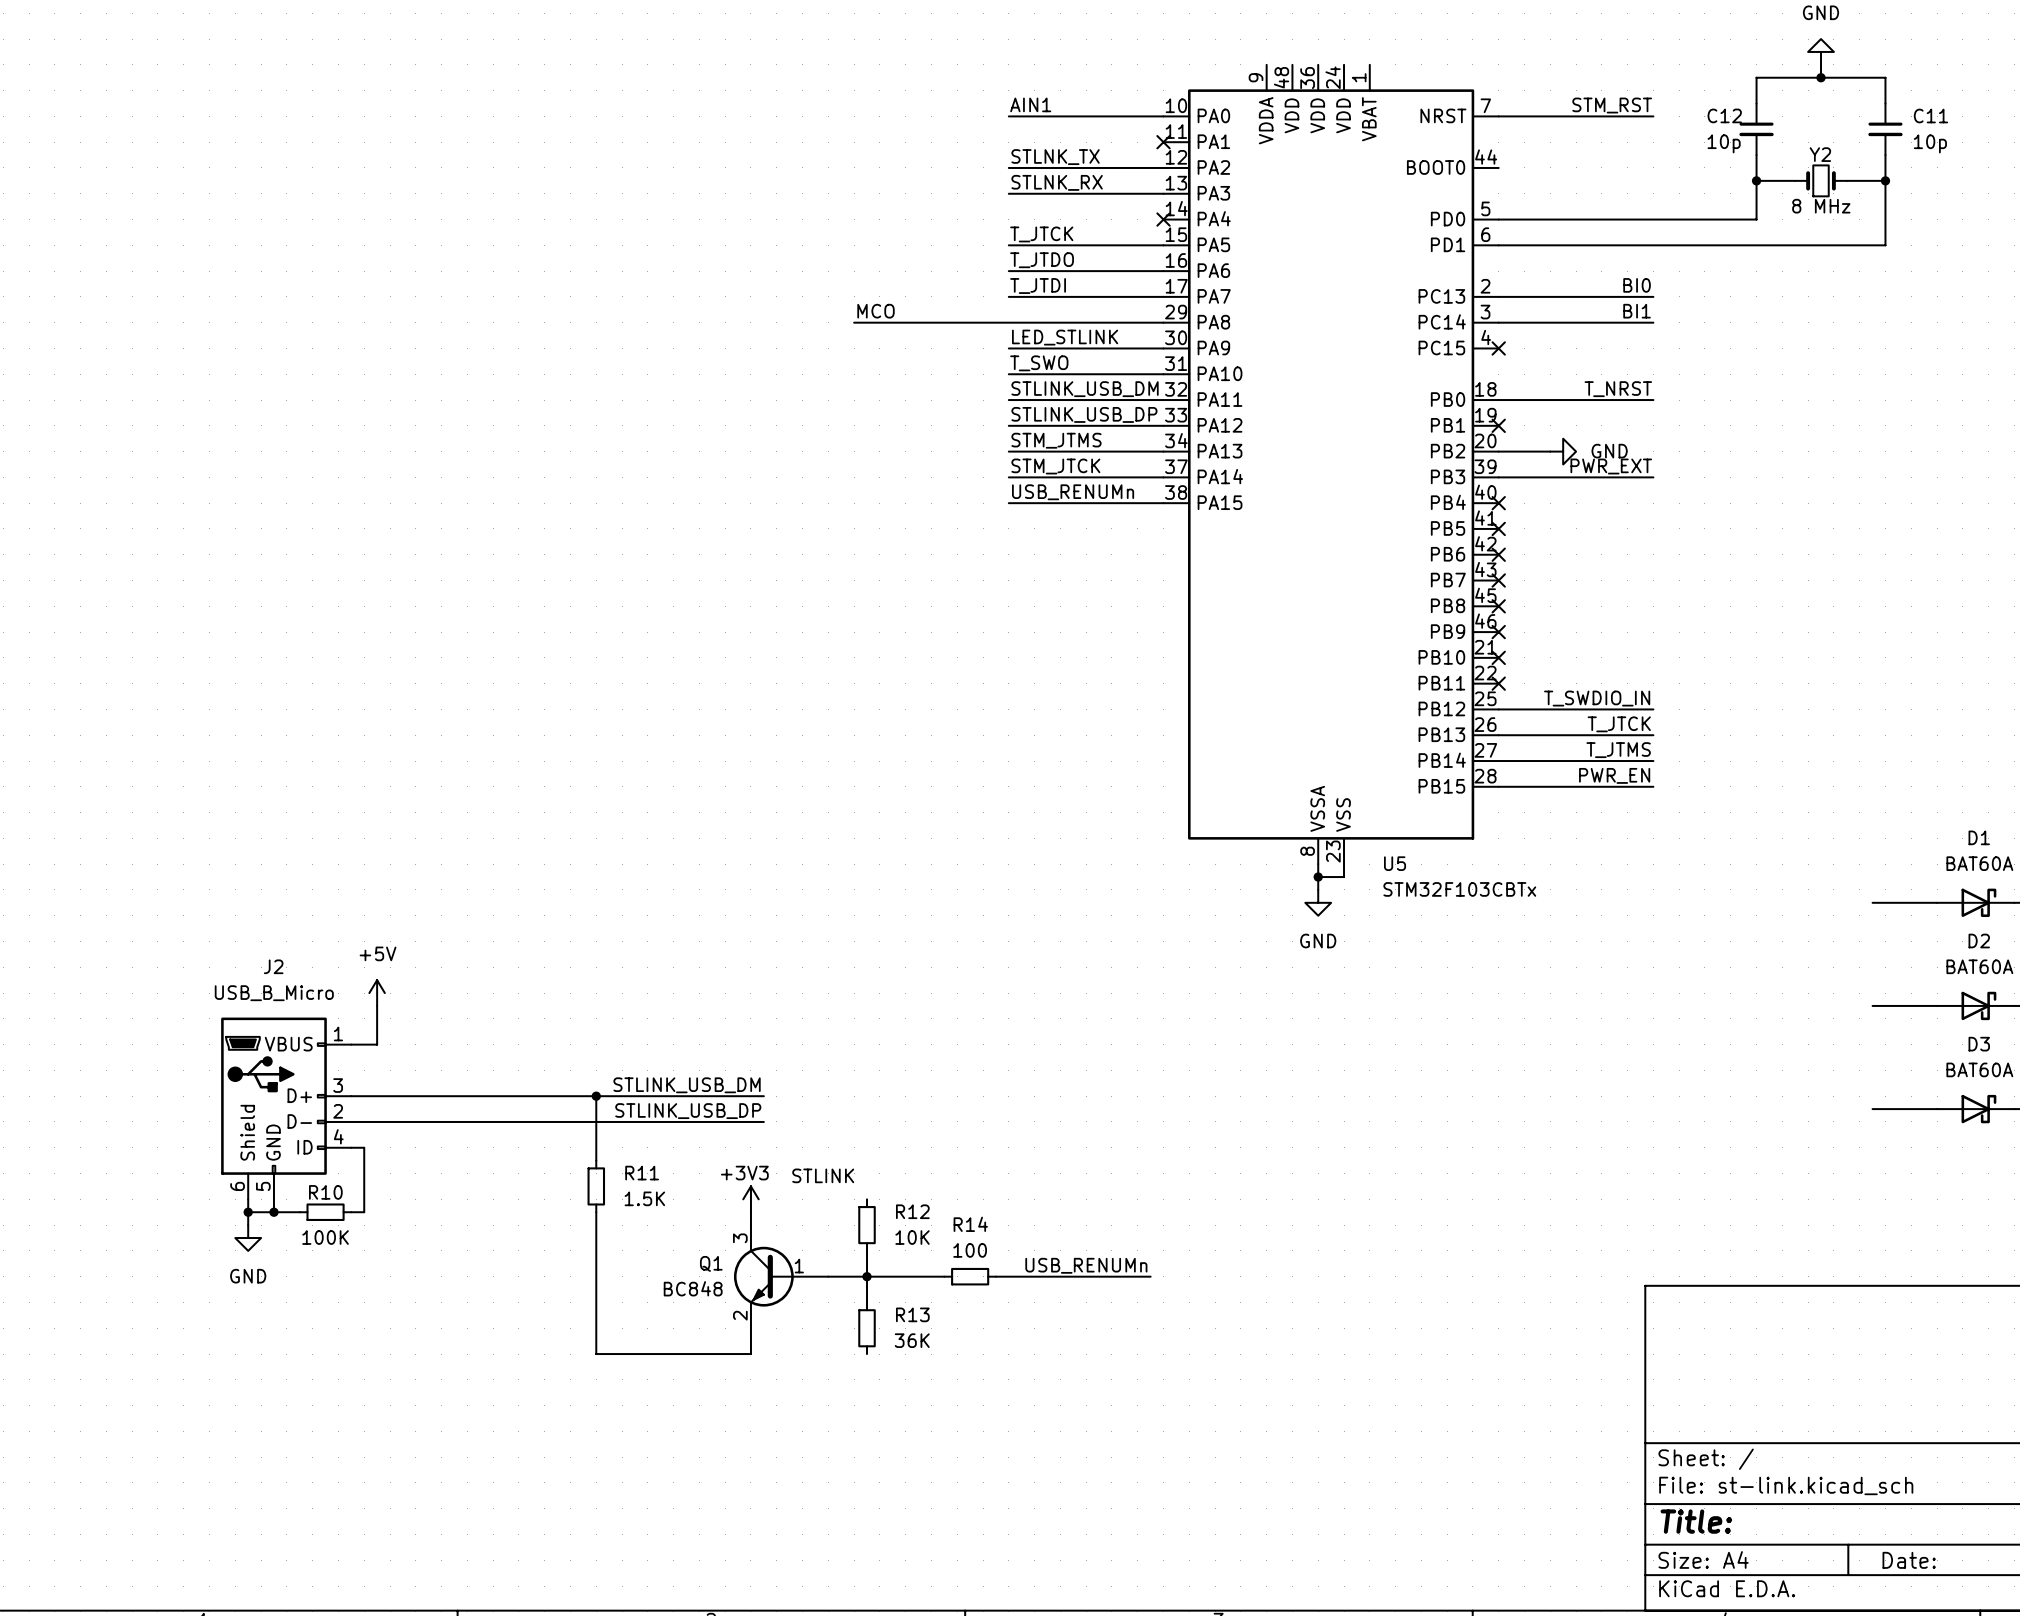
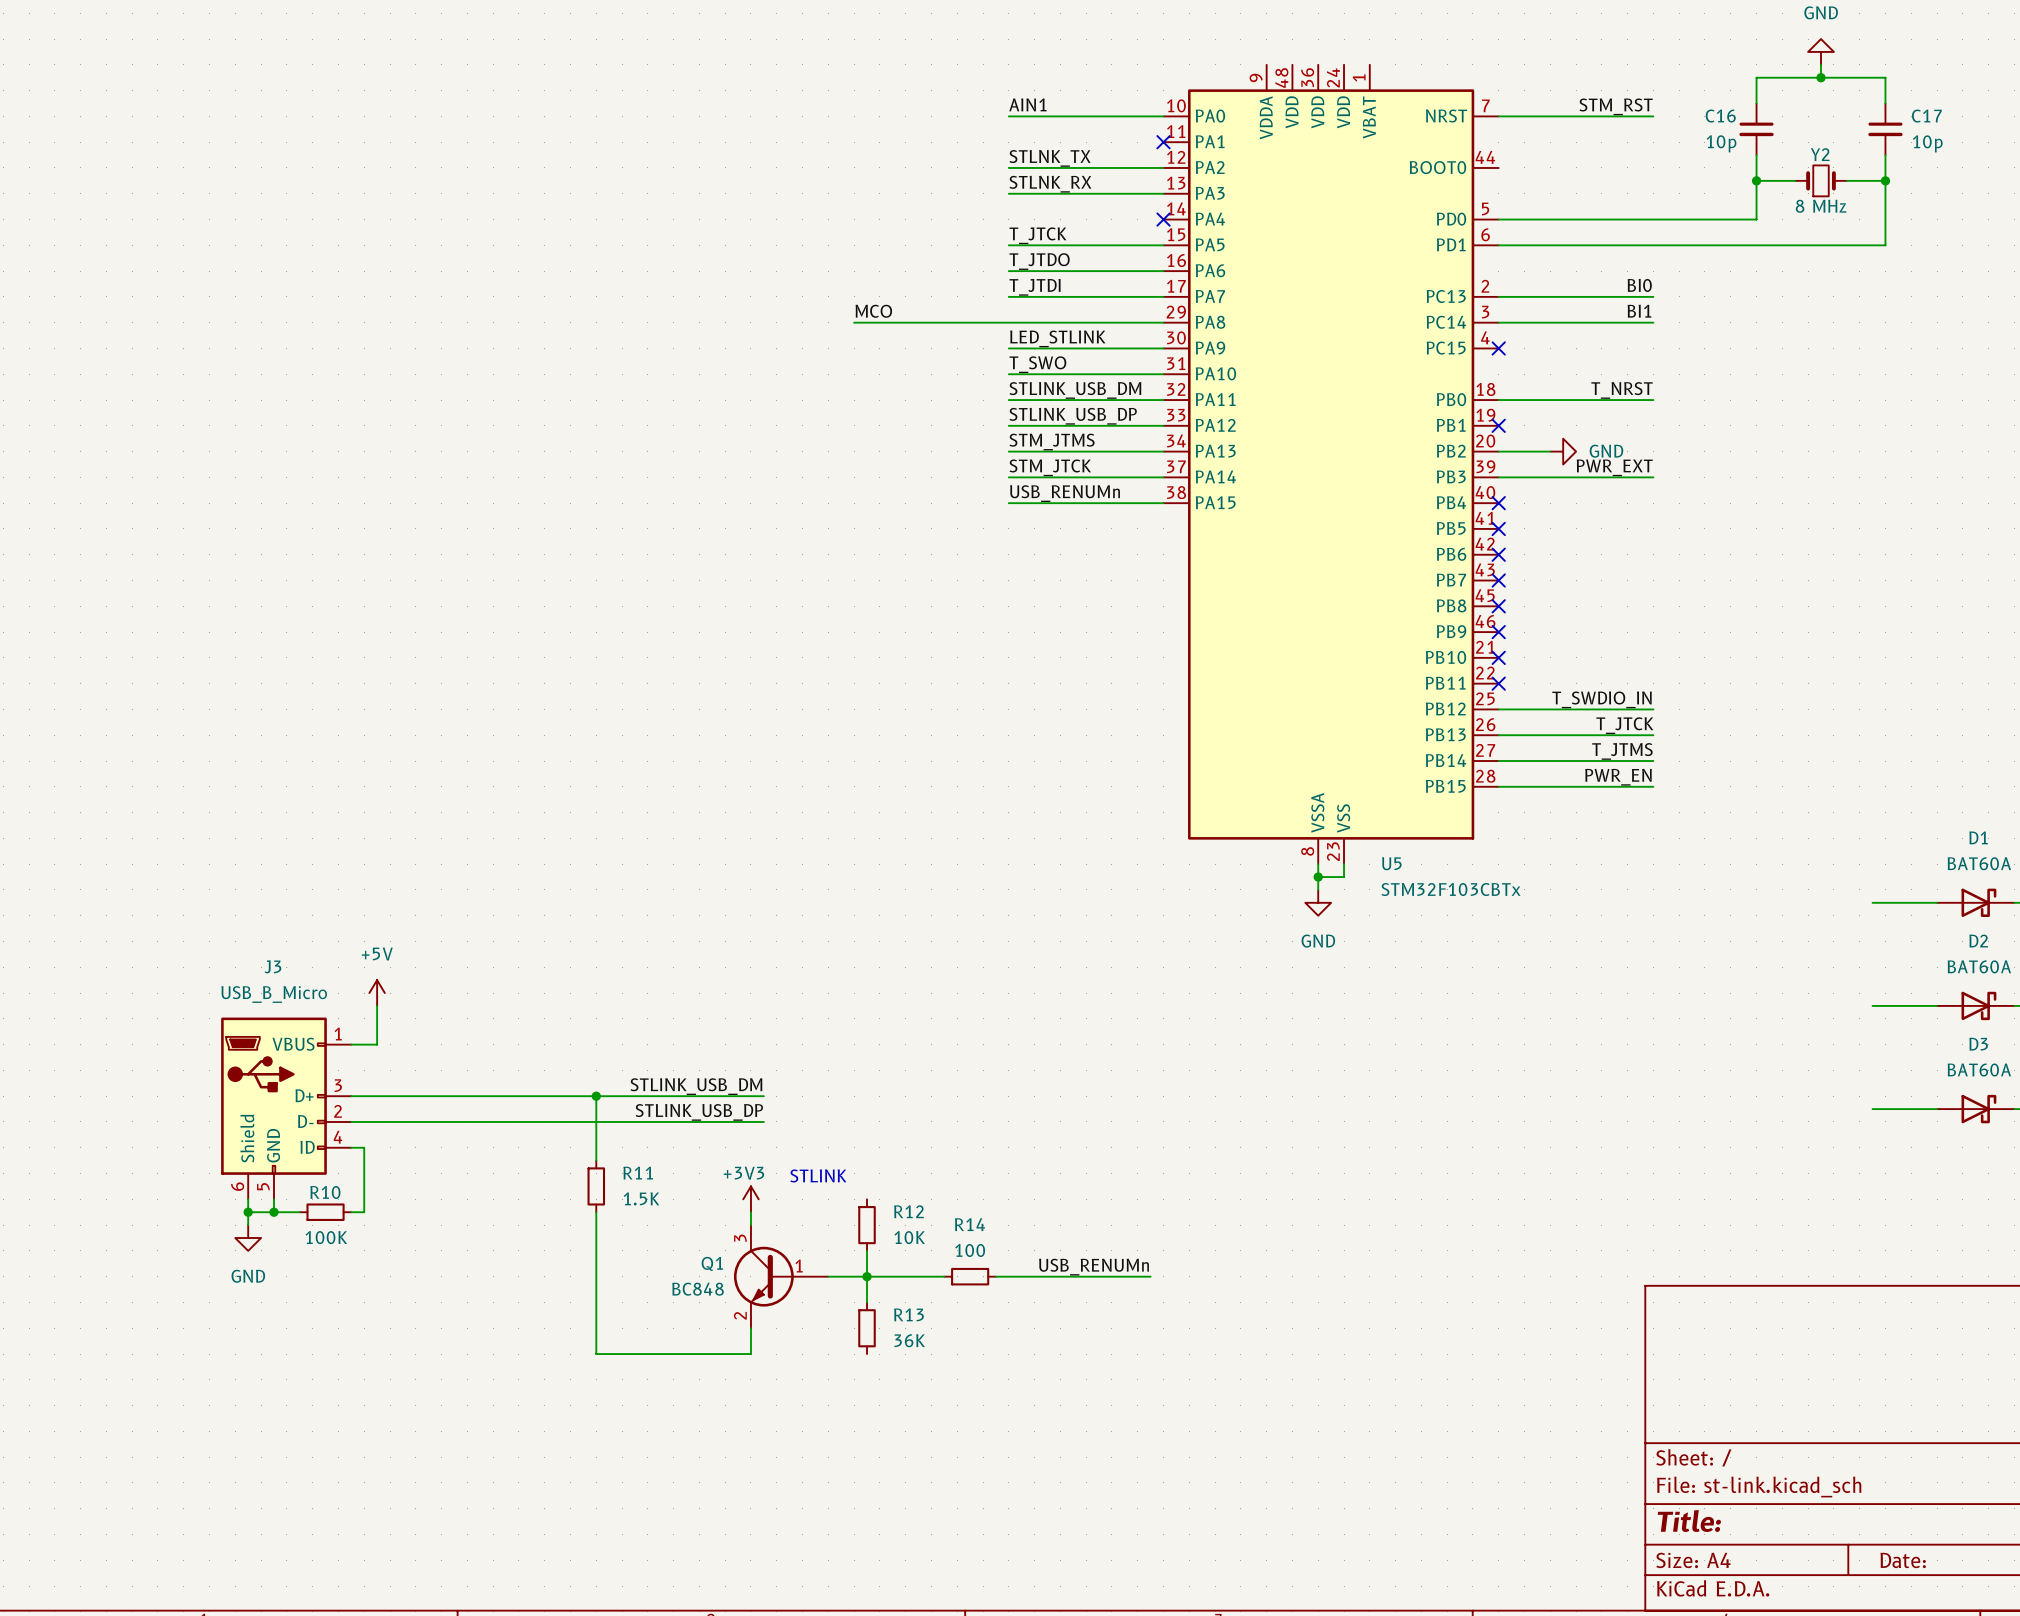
C12 name: C12 (1724, 115) -> C16 (1720, 116)
C11 name: C11 (1930, 115) -> C17 (1926, 116)
J2 name: J2 (273, 966) -> J3 (272, 966)

